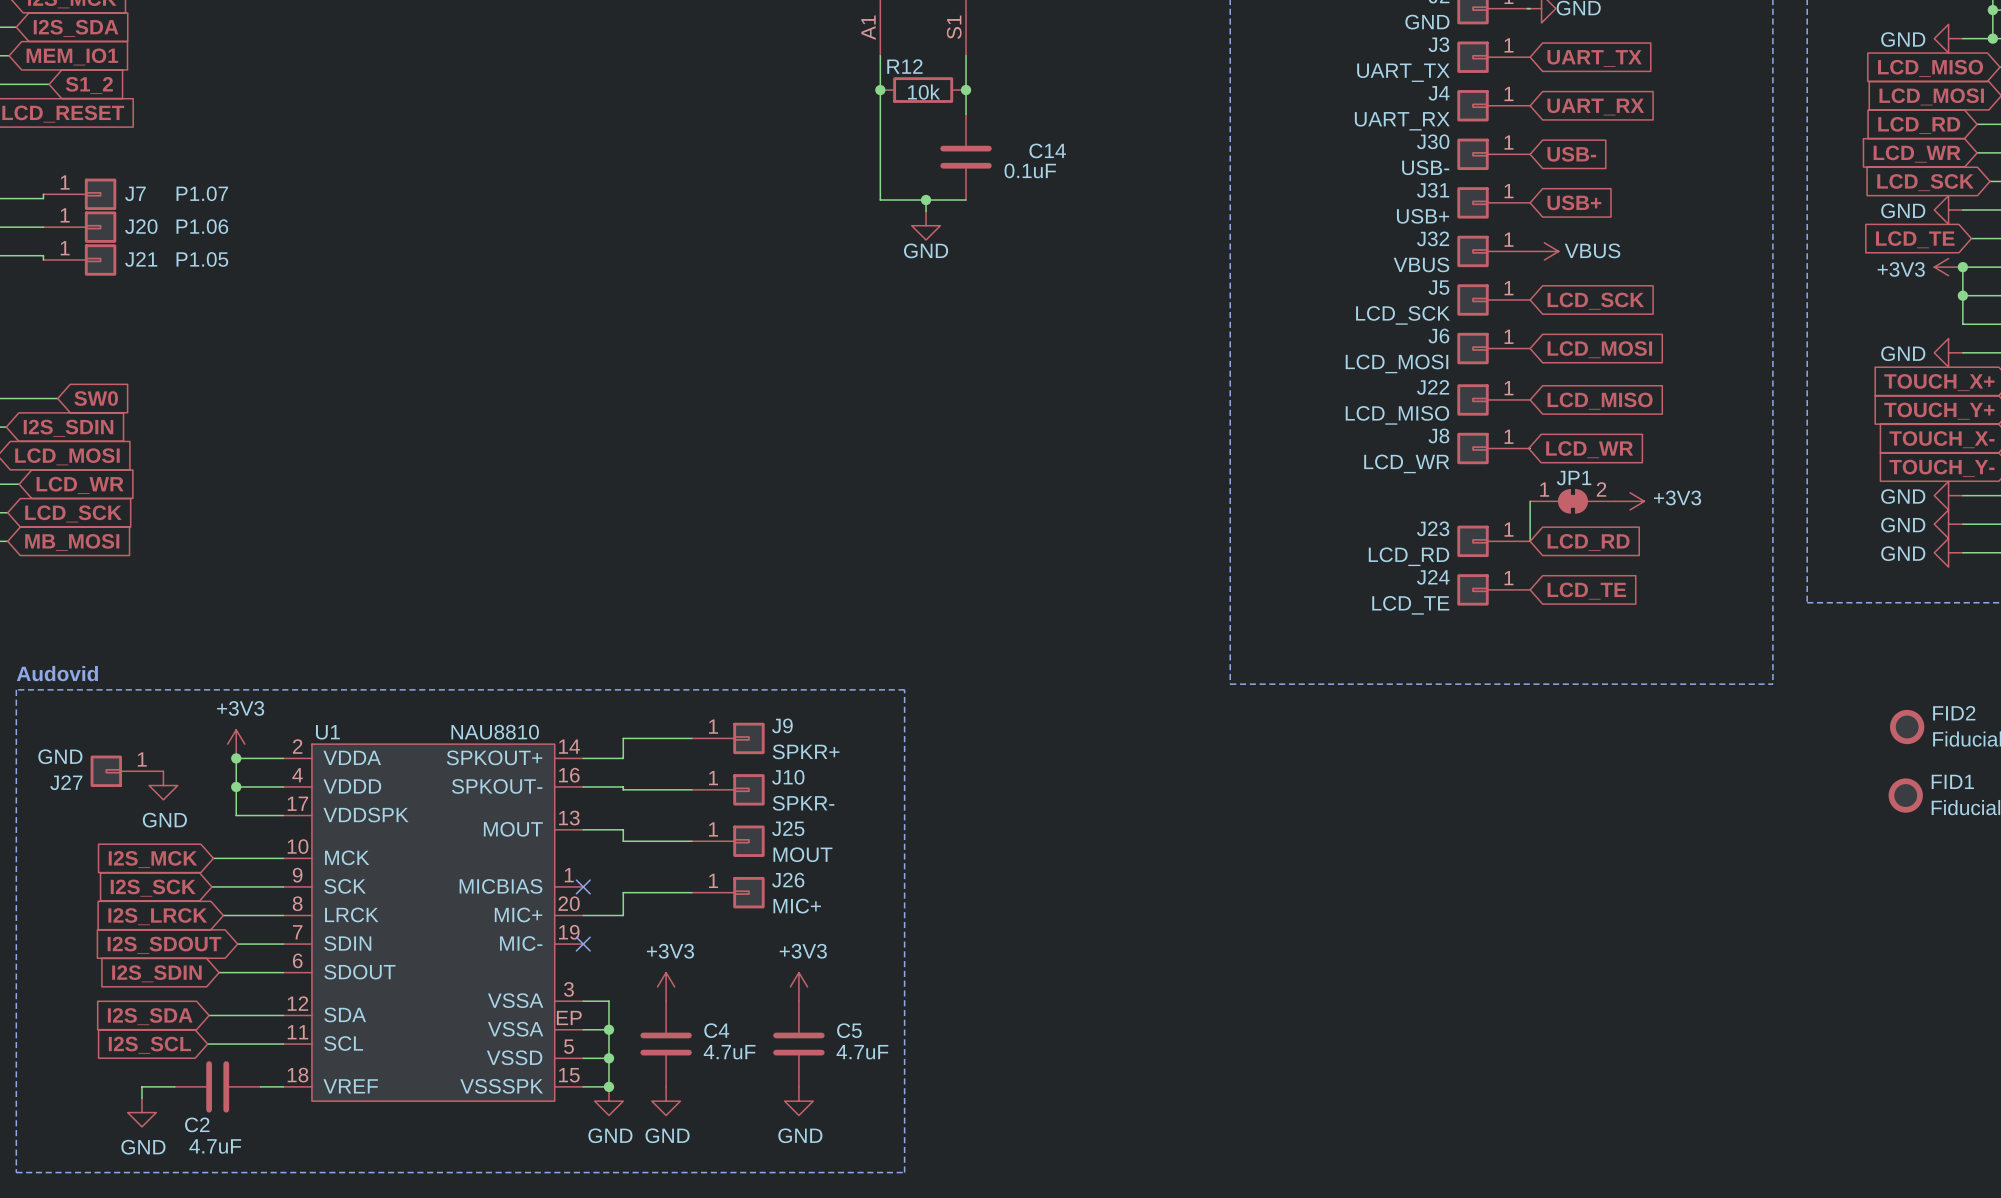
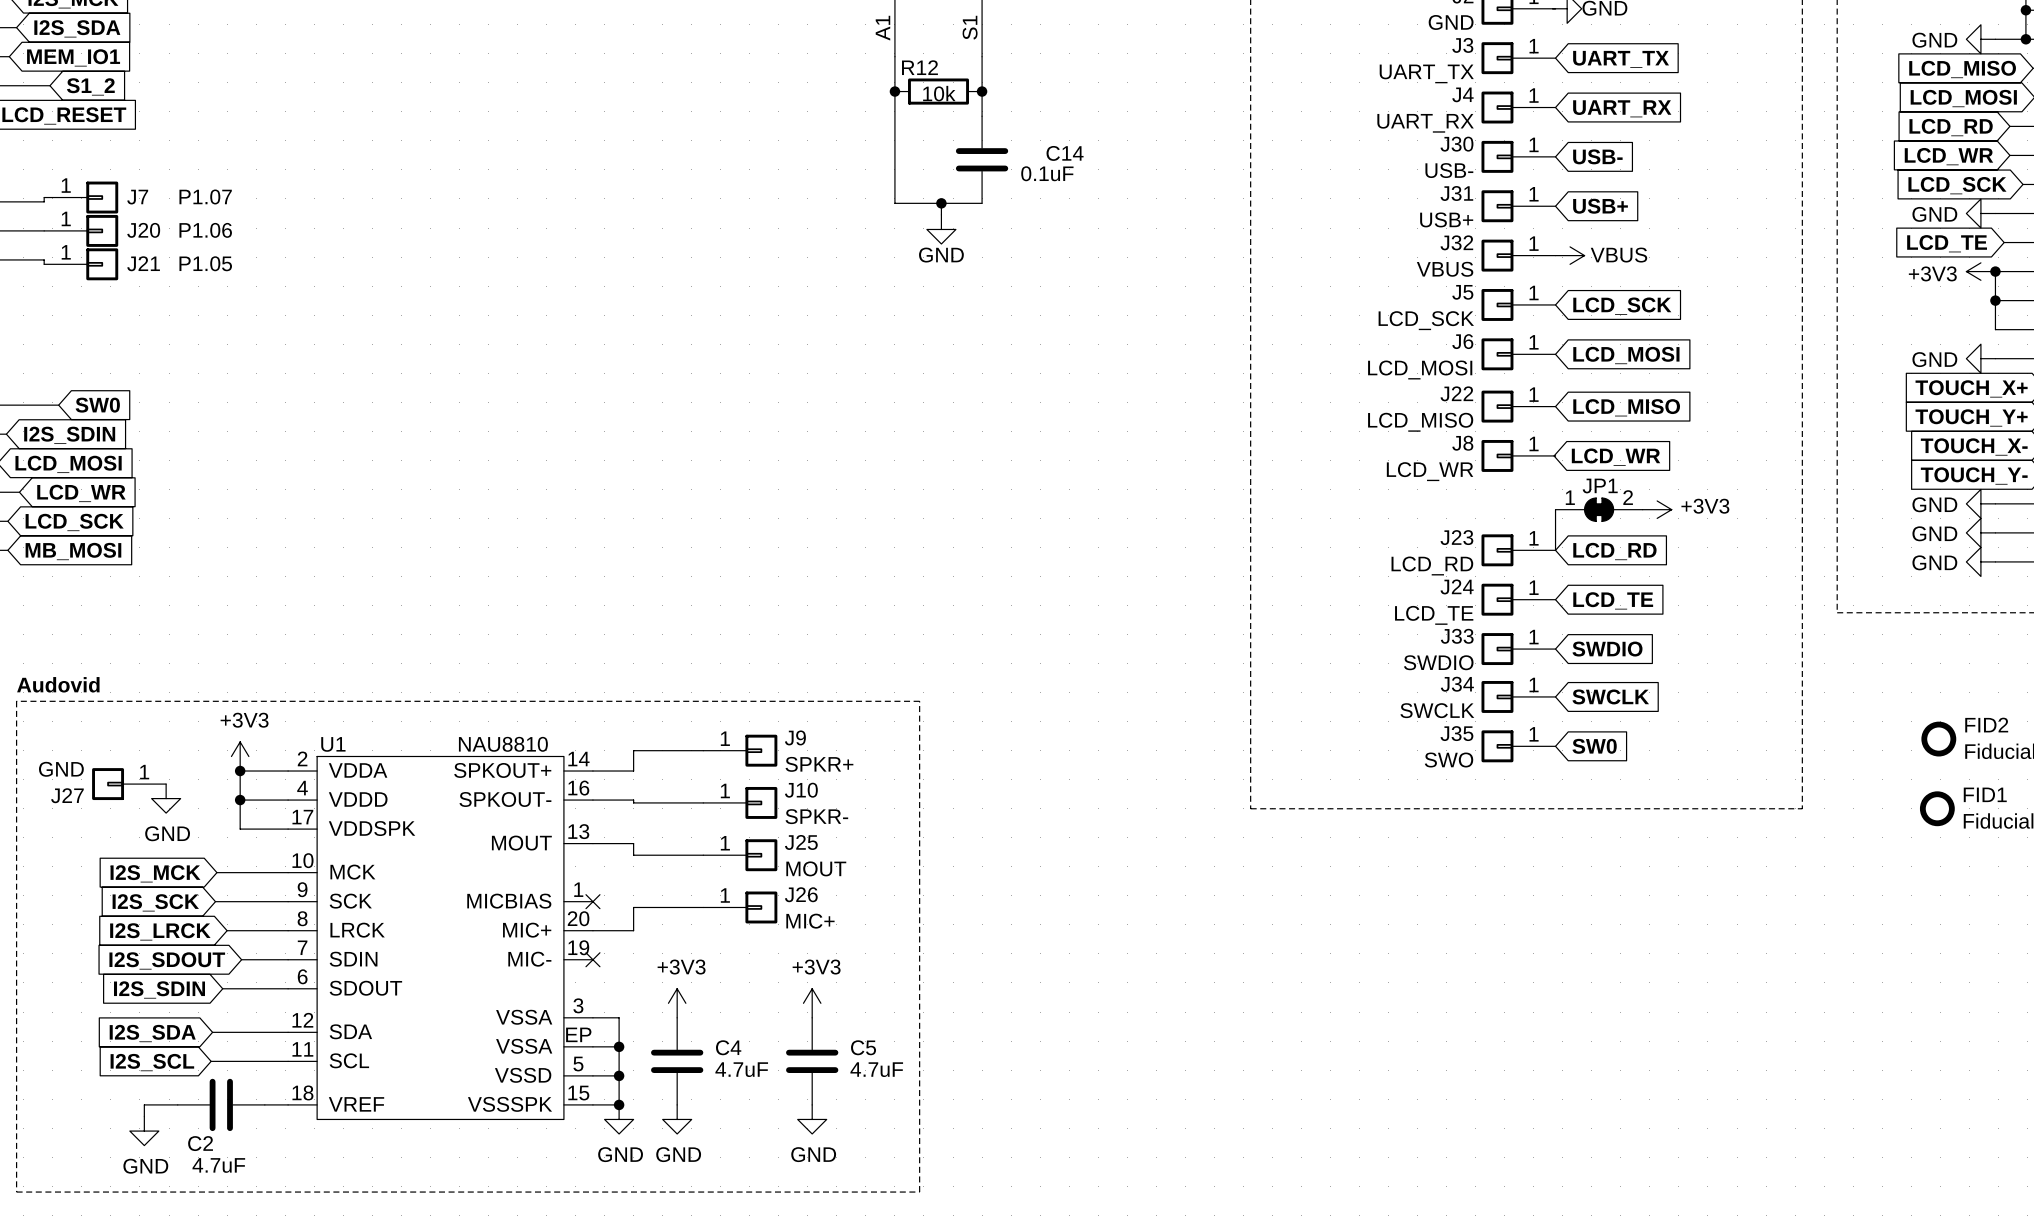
J33: none -> SWDIO (1518, 649)
global label: none -> SWDIO (1607, 649)
line: (1230, 684) (1772, 684) -> (1250, 695) (1250, 808) (1802, 808) (1802, 695)
J34: none -> SWCLK (1518, 696)
global label: none -> SWCLK (1610, 696)
J35: none -> SWO (1518, 746)
global label: none -> SW0 (1594, 746)

